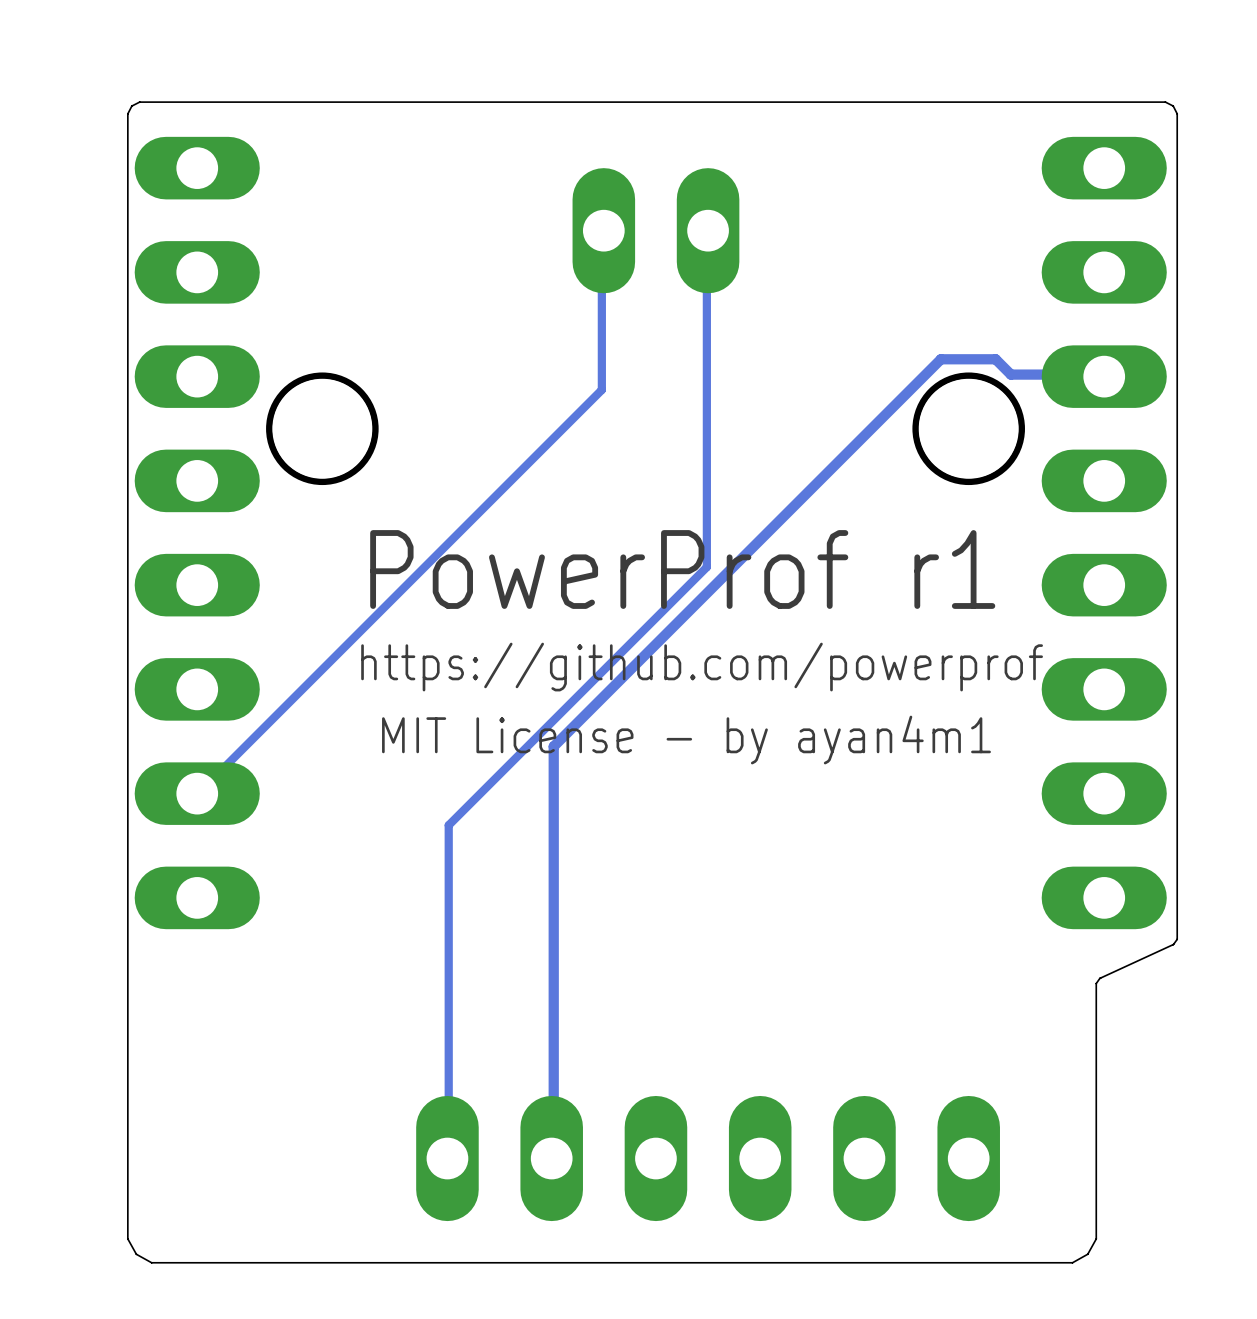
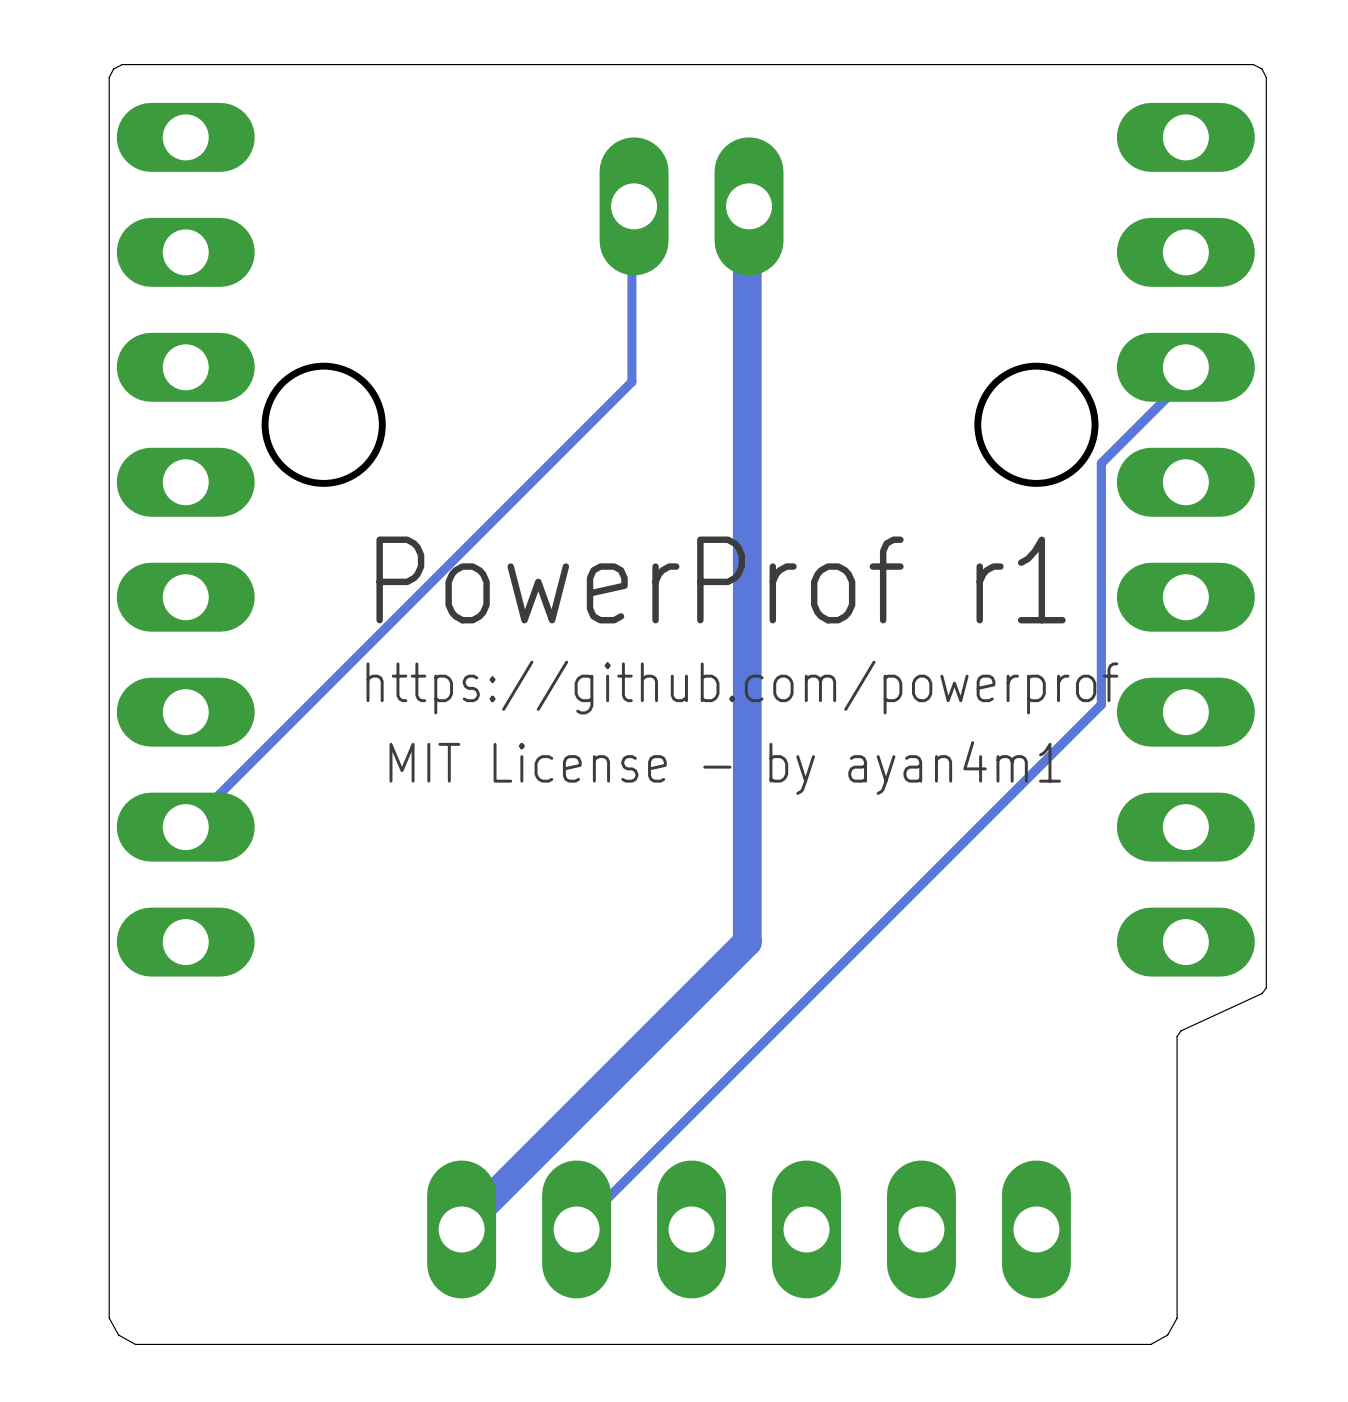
track: (708, 230) (706, 567) (448, 825) (447, 1158) -> (749, 206) (747, 209) (747, 942) (461, 1229)
track: (1104, 376) (1102, 374) (1010, 374) (995, 359) (940, 359) (553, 746) (553, 1157) (551, 1158) -> (1185, 367) (1185, 378) (1101, 463) (1101, 704) (576, 1229)

